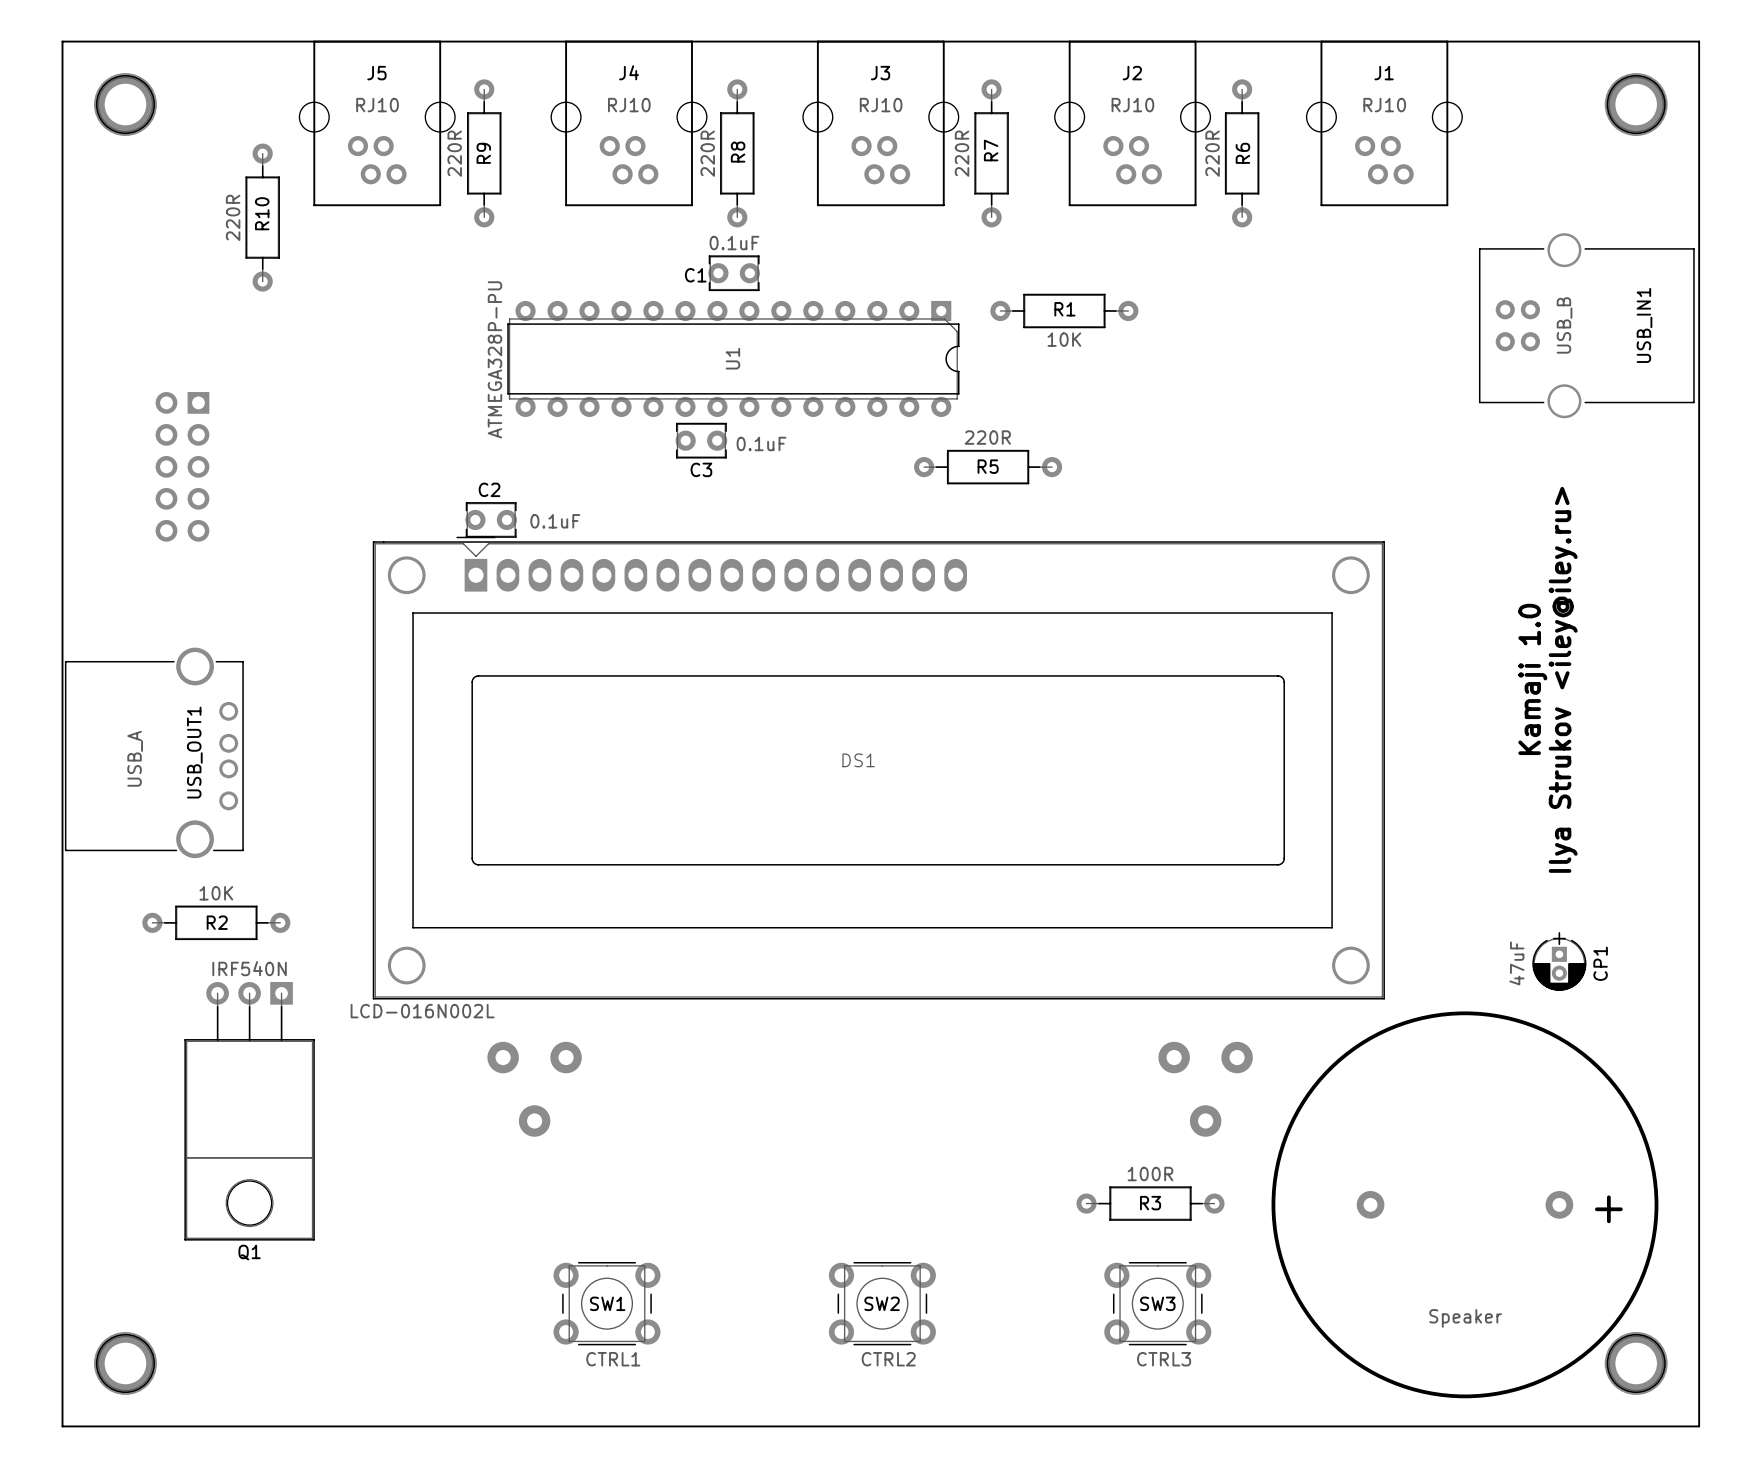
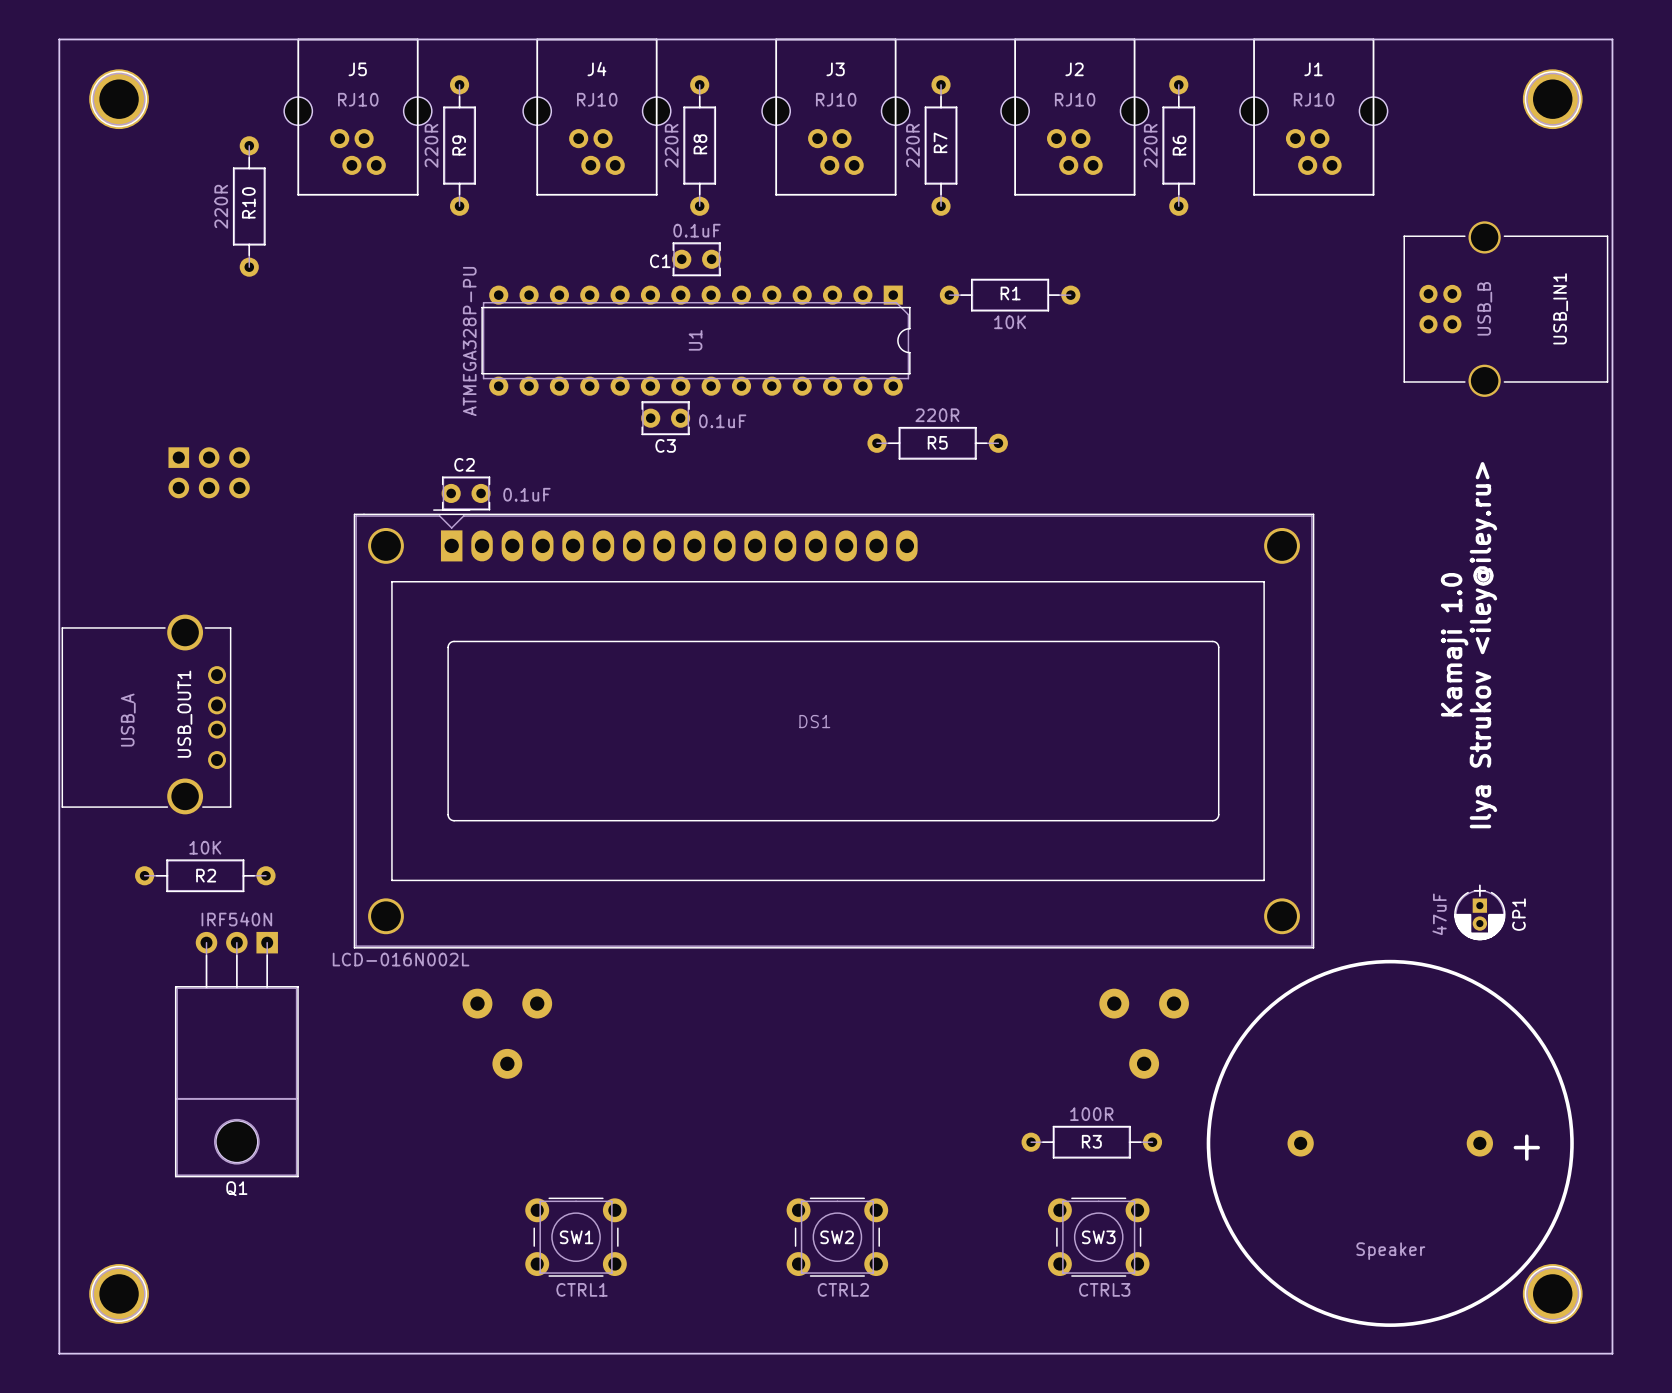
part: (182, 466) -> none
part: none -> (209, 472)

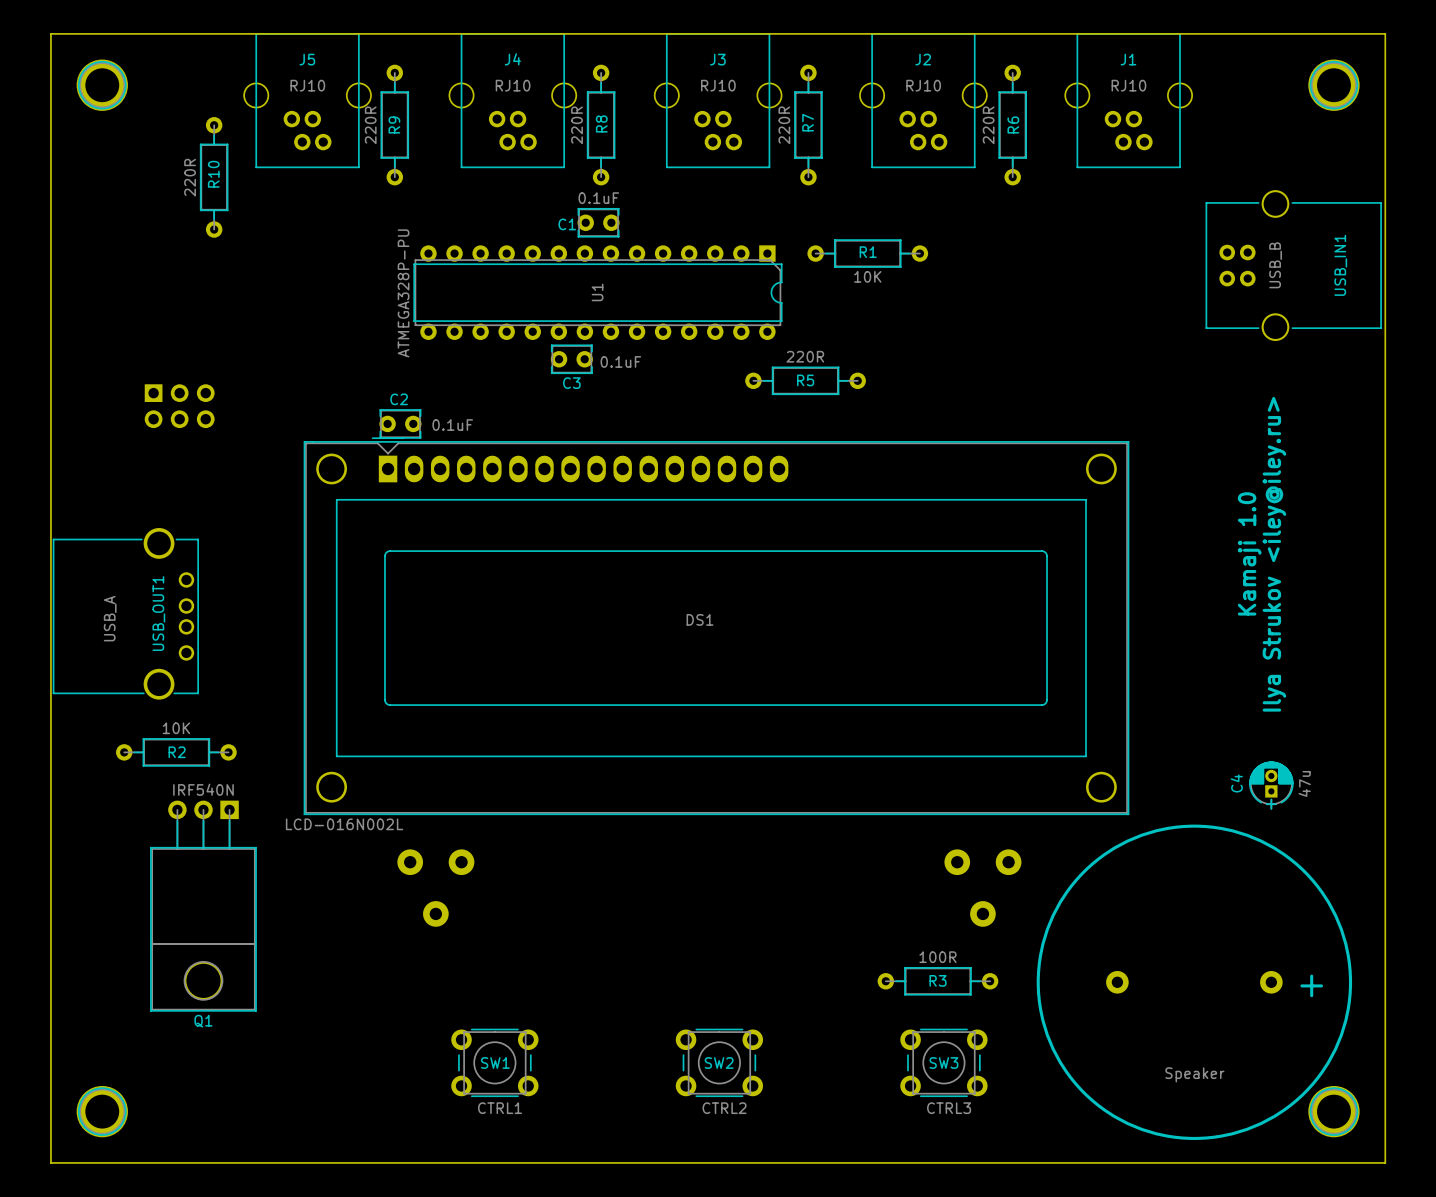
CP1: 47uF (1479, 912) -> none
C4: none -> 47u (1271, 785)

